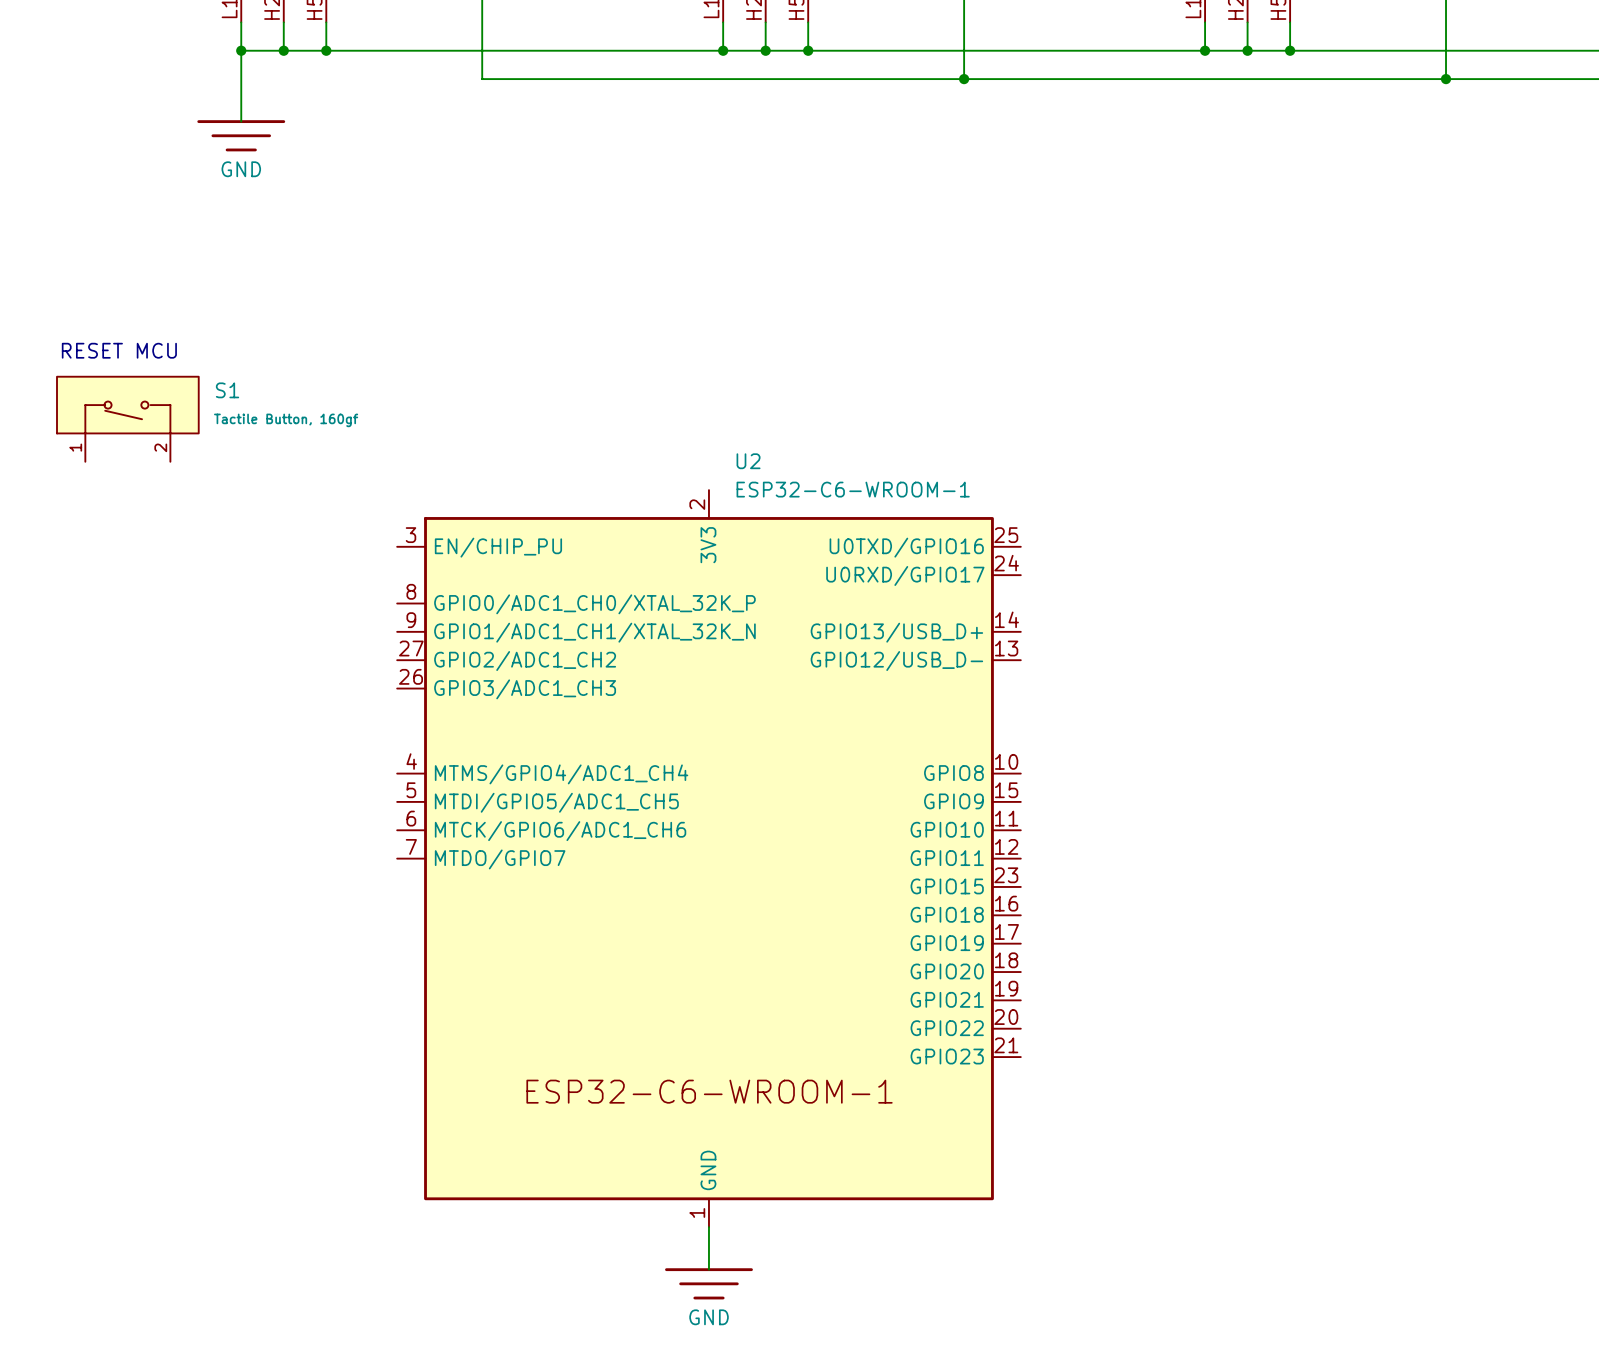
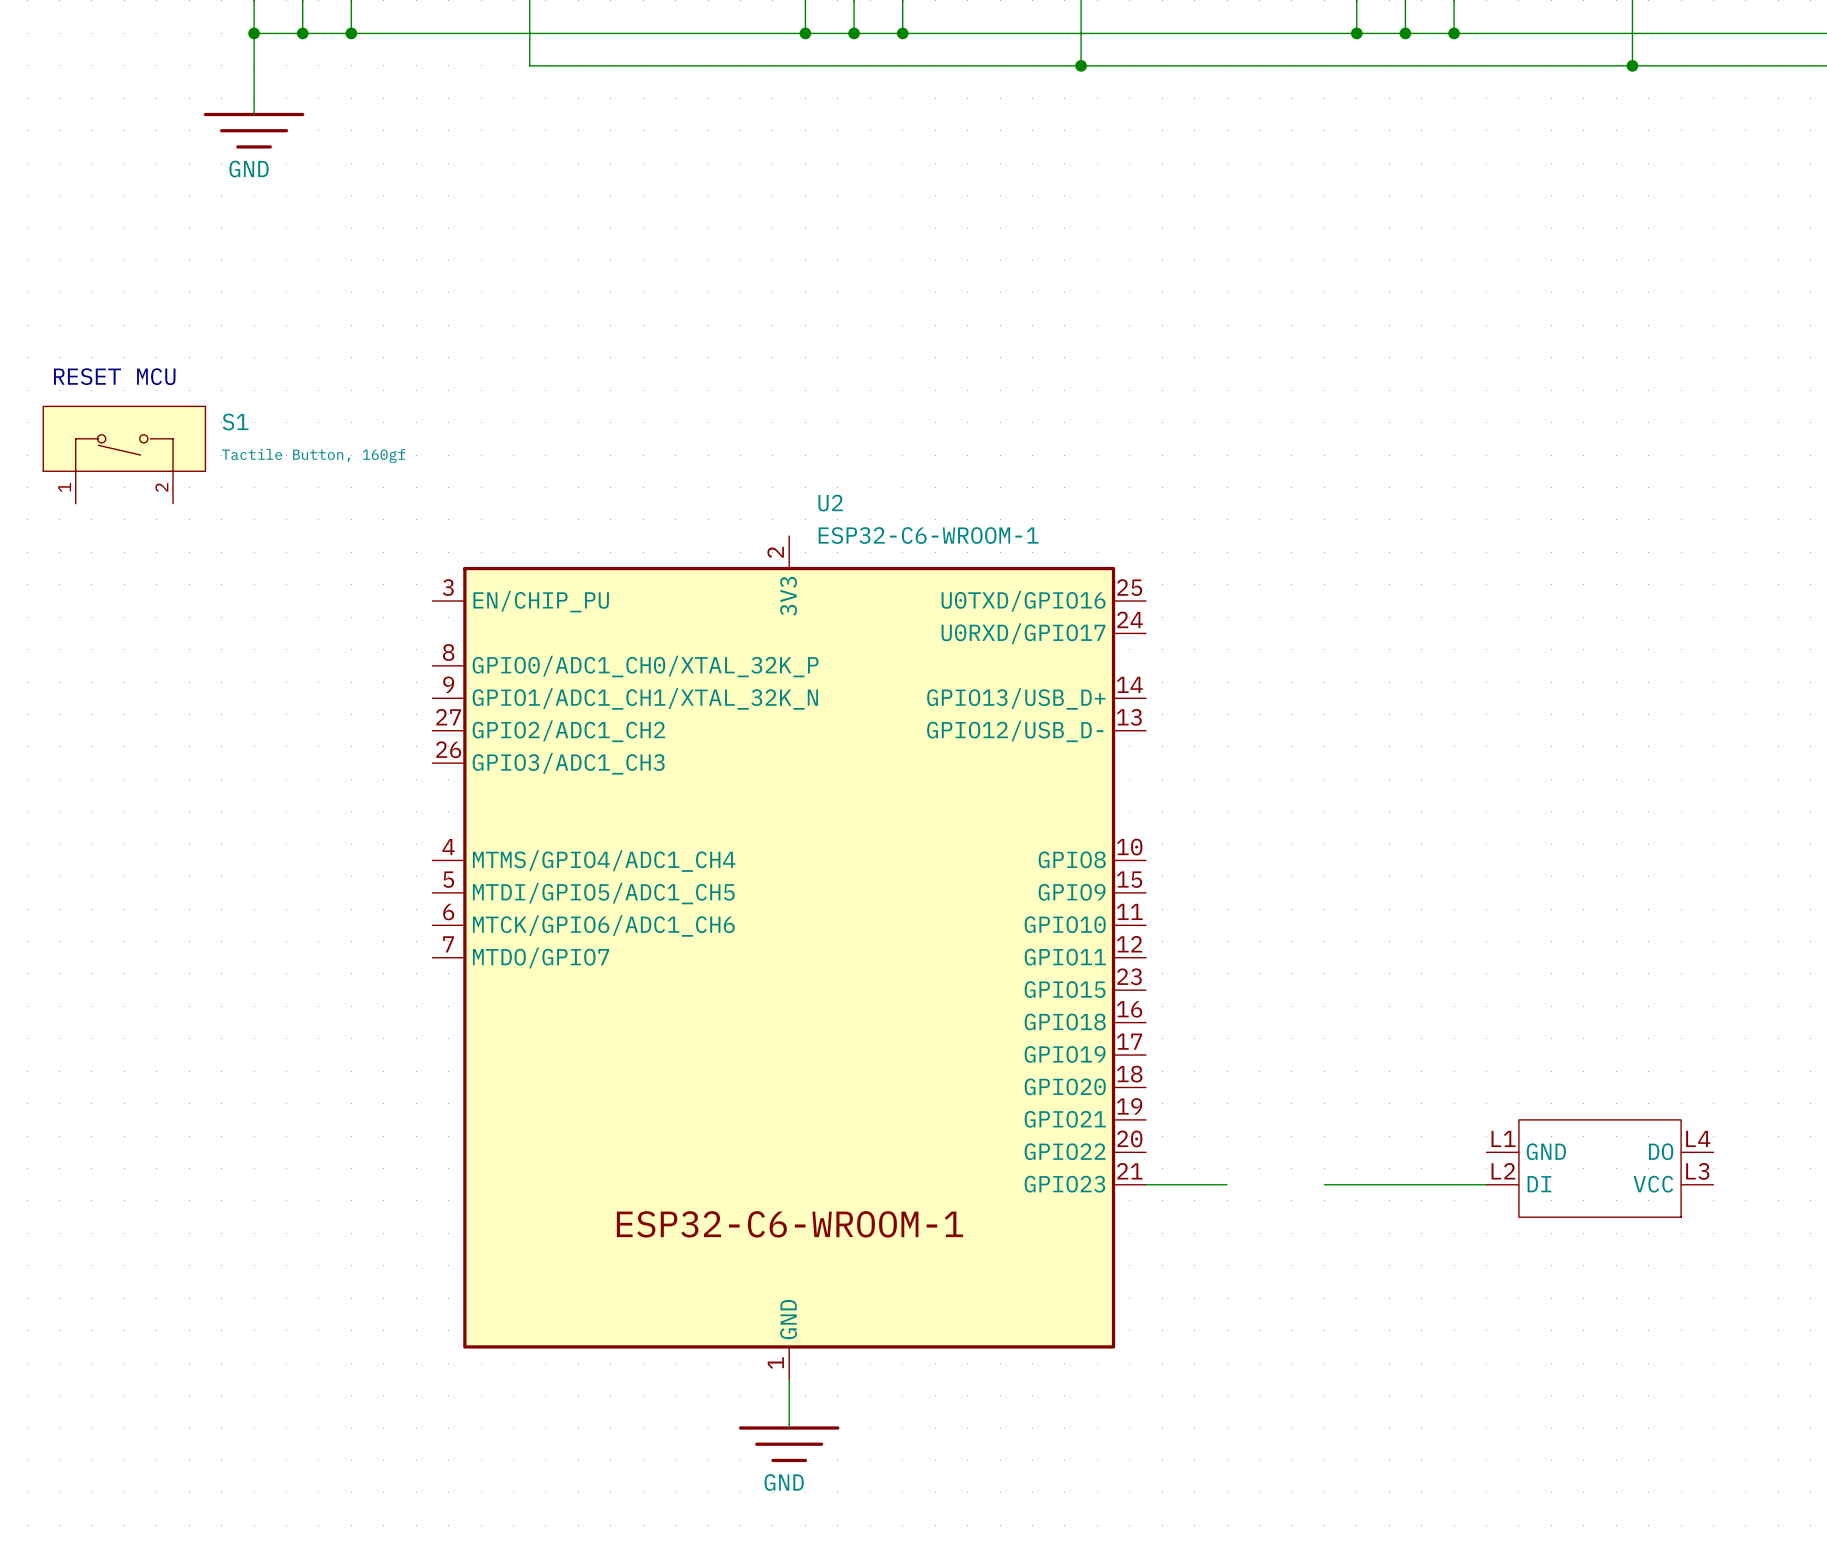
part: none -> (1600, 1168)
wire: none -> (1145, 1184) (1227, 1184)
wire: none -> (1324, 1184) (1486, 1184)

